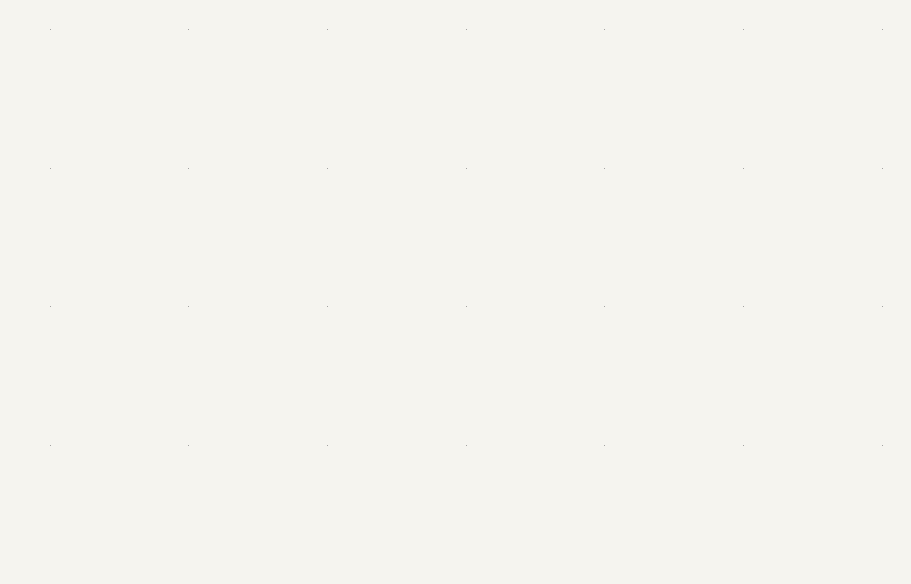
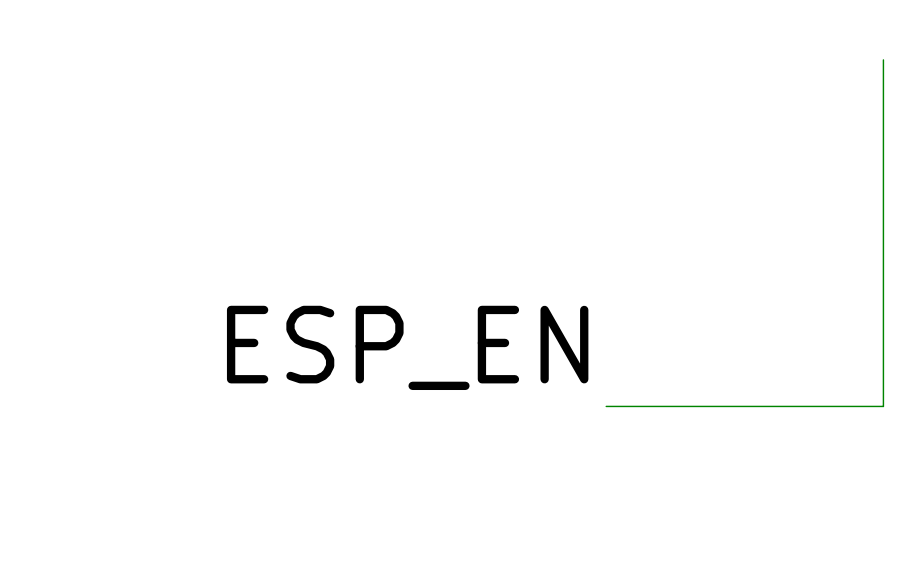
wire: none -> (883, 59) (883, 406) (606, 406)
label: none -> ESP_EN (407, 347)

